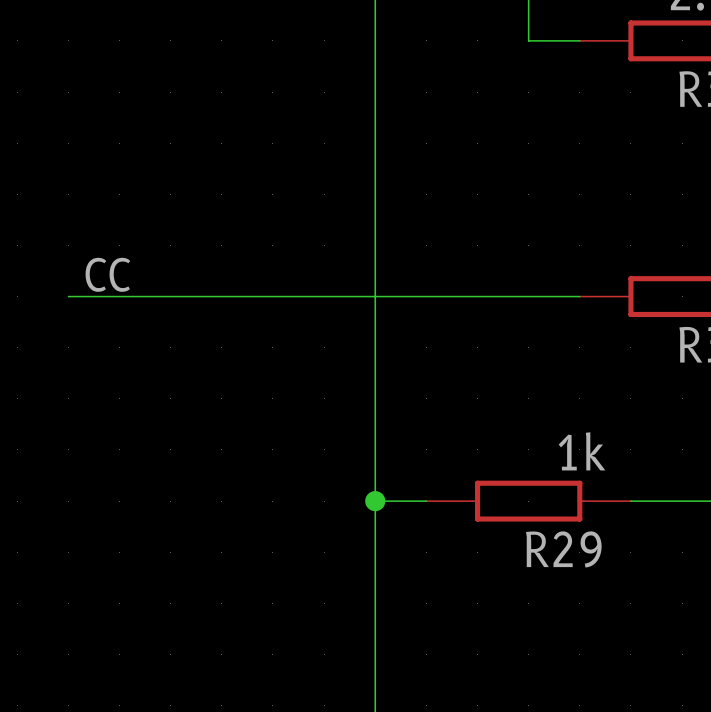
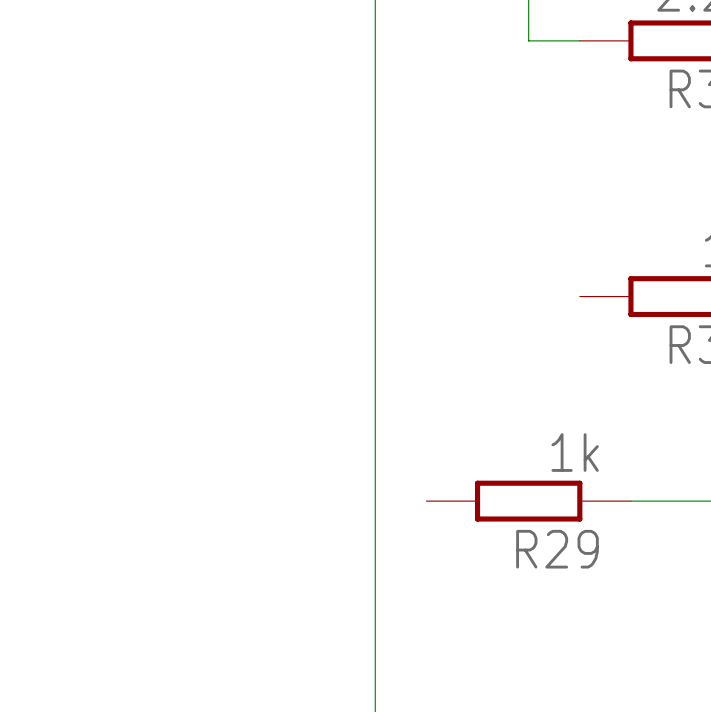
label: CC (107, 274) -> none
wire: (68, 296) (579, 296) -> none
wire: (375, 501) (426, 501) -> none
junction: (375, 501) -> none

